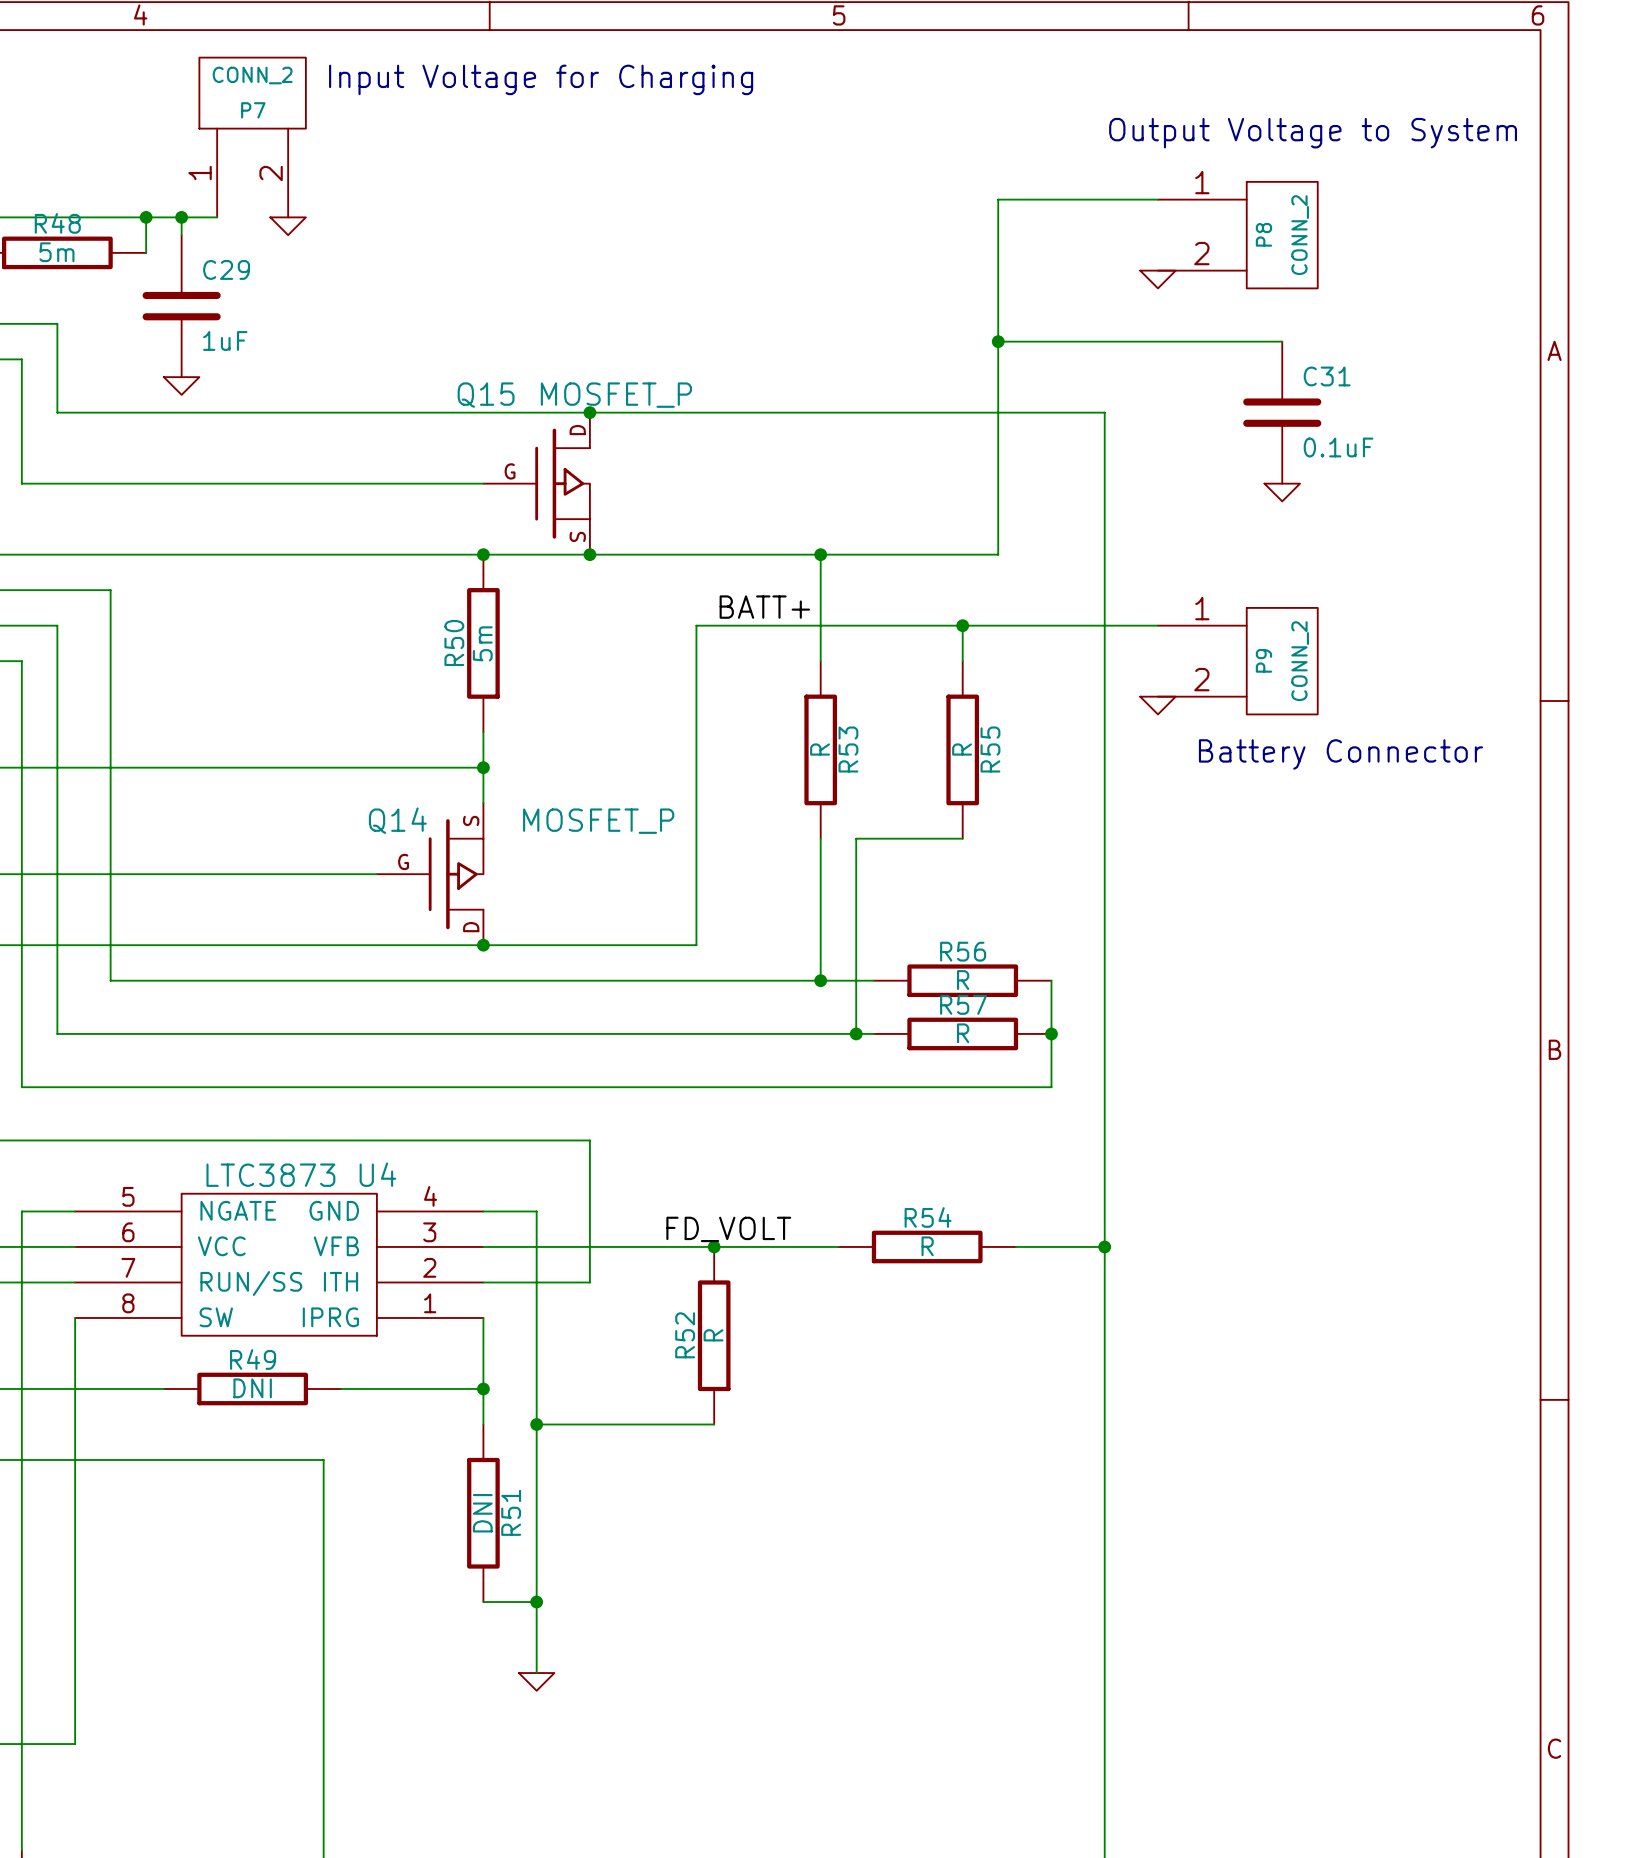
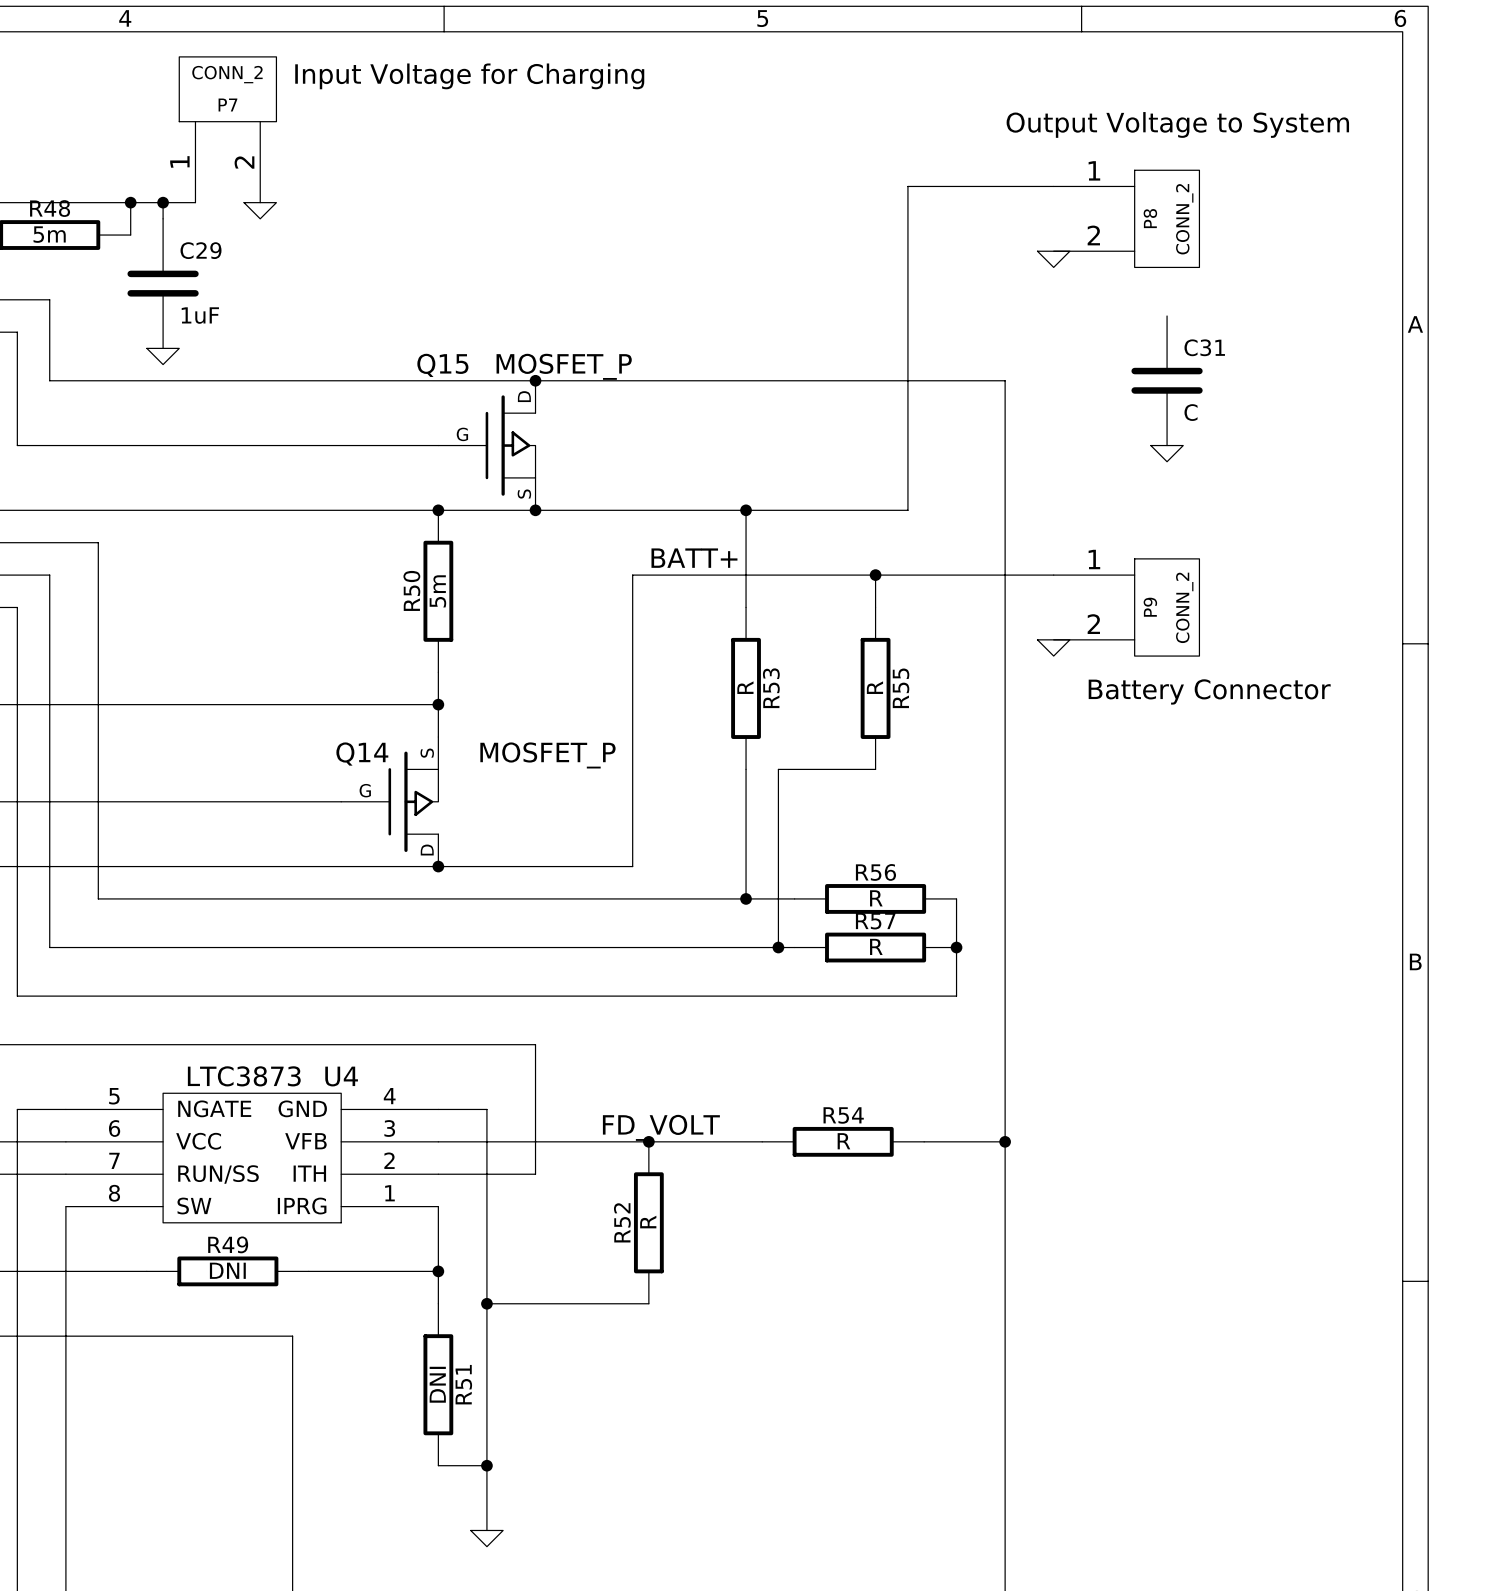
wire: (998, 341) (1282, 341) -> none
junction: (998, 341) -> none
C31 value: 0.1uF (1338, 447) -> C (1191, 412)

